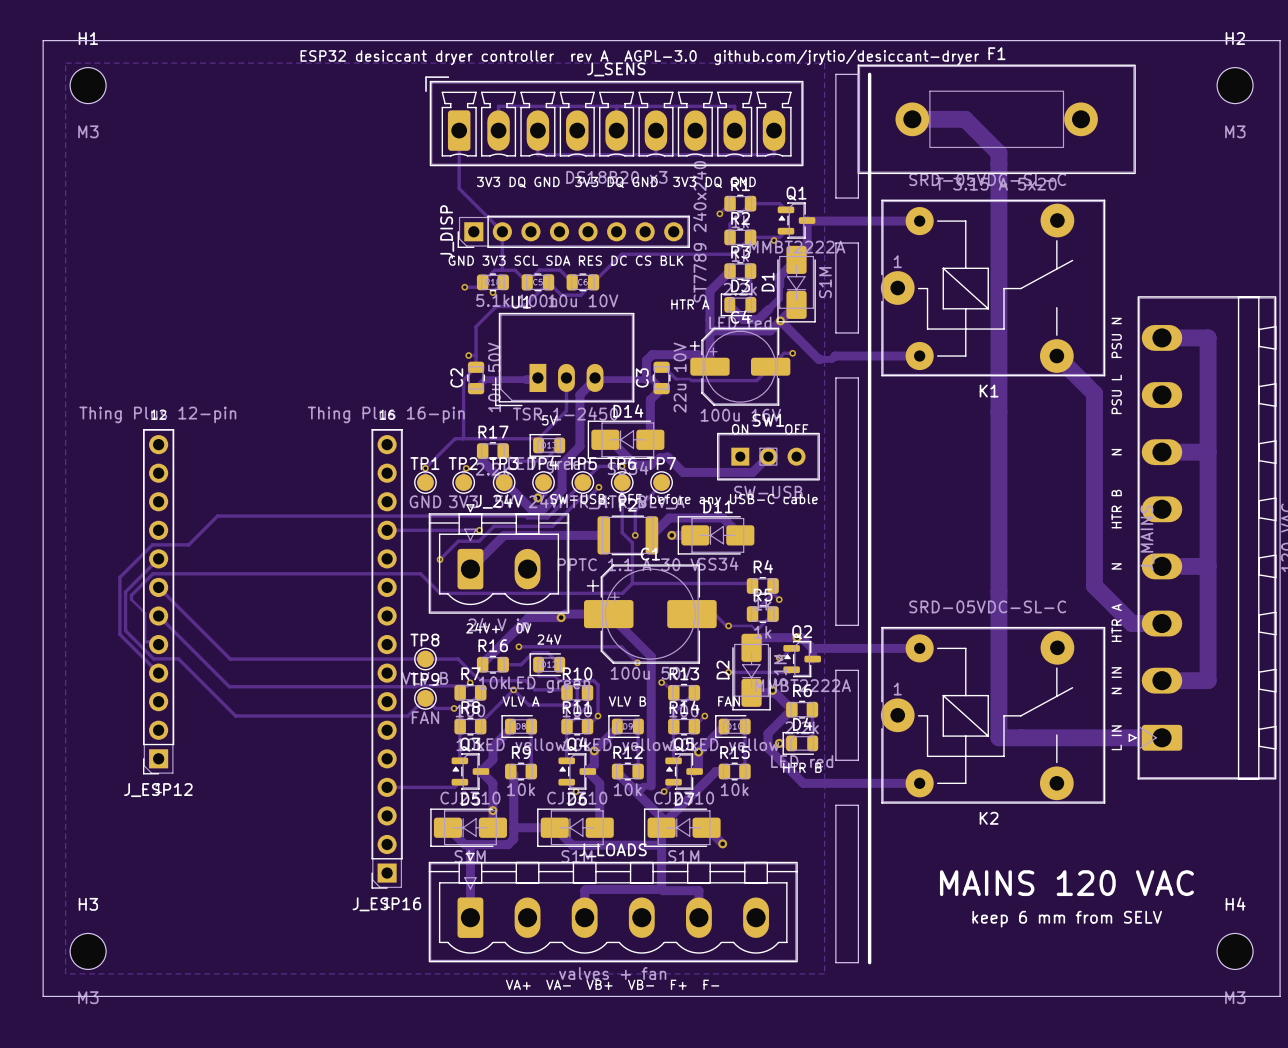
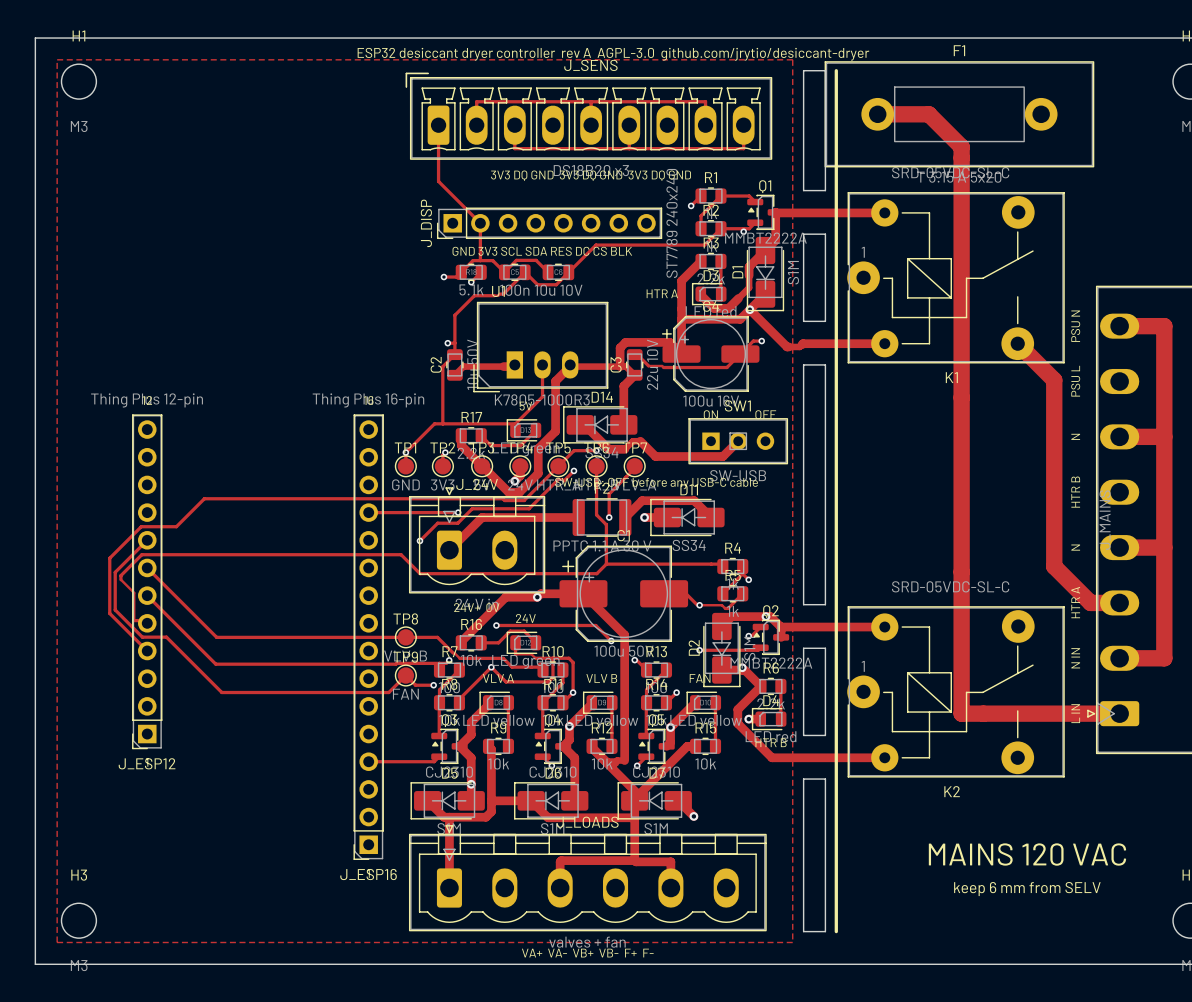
U1 value: TSR 1-2450 (565, 413) -> K7805-1000R3 (542, 399)

